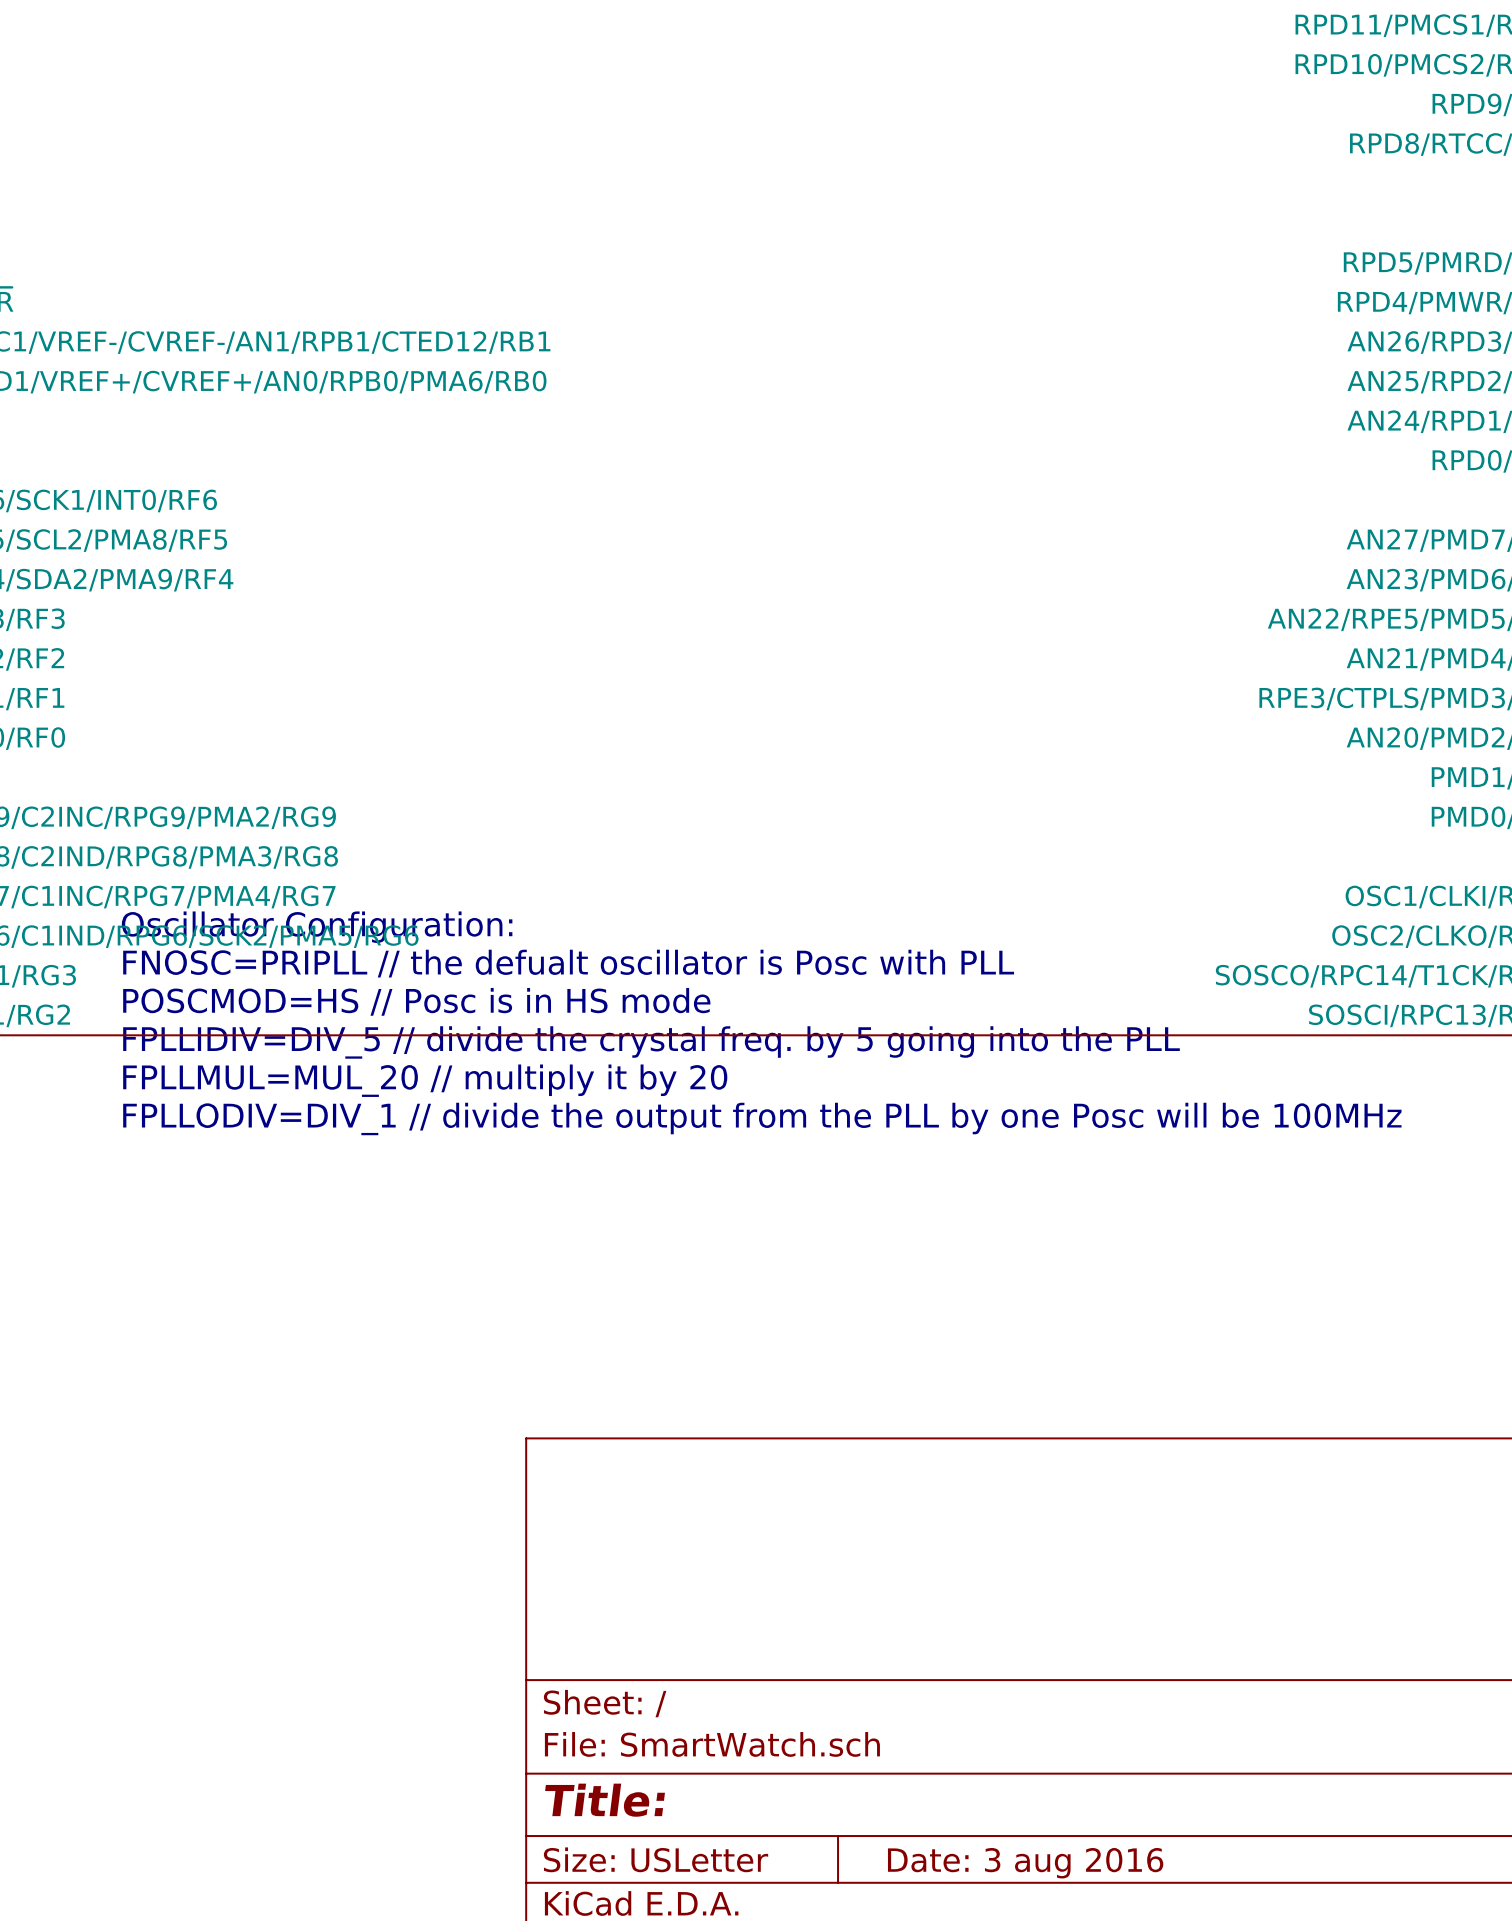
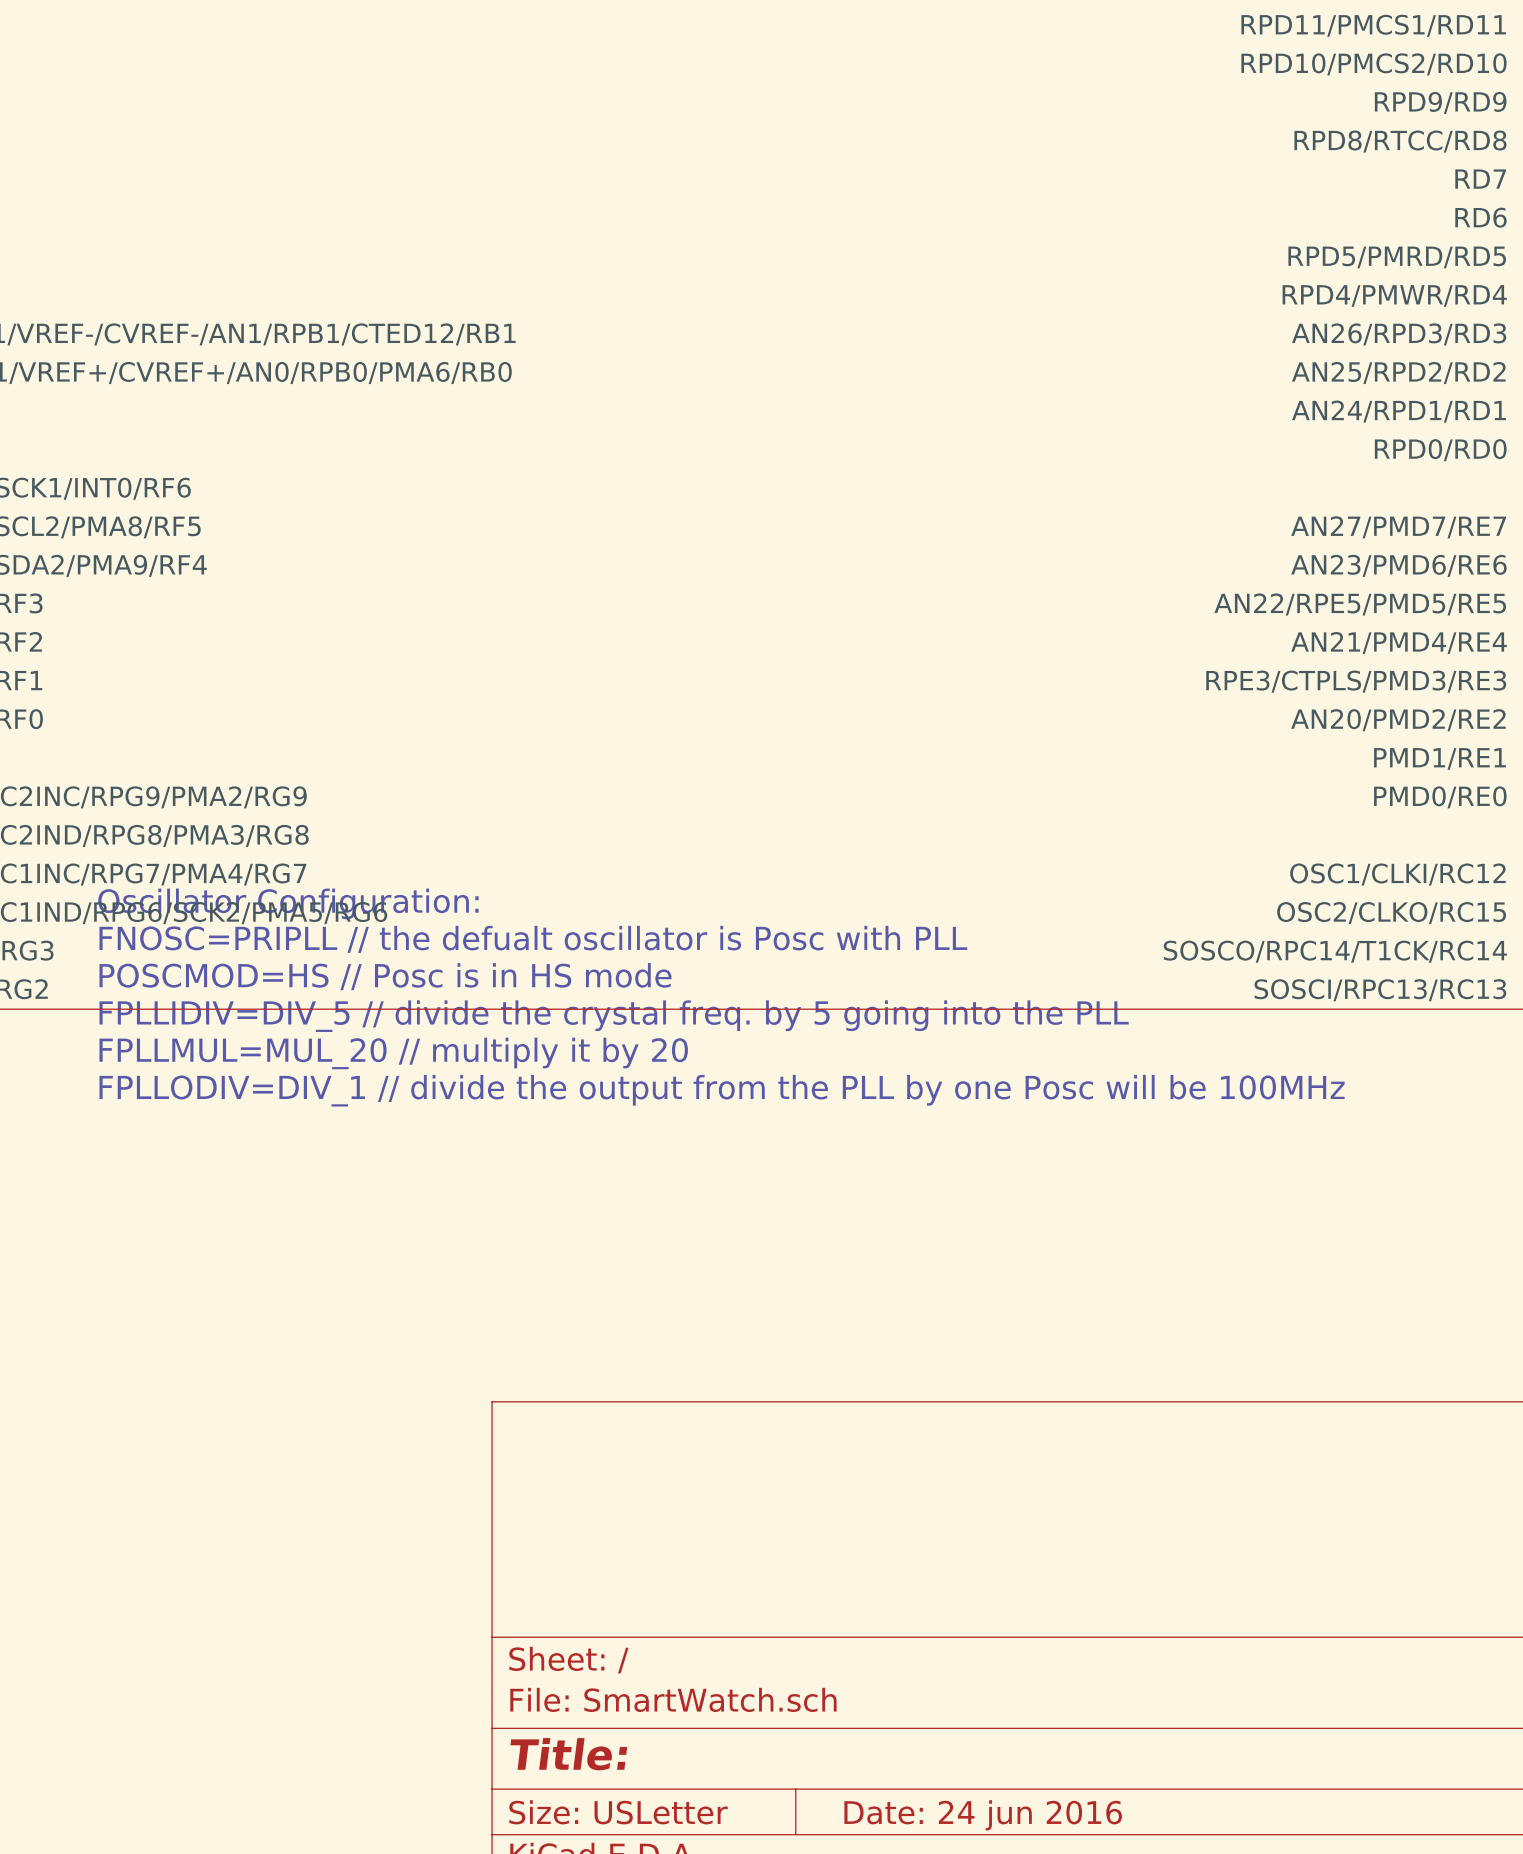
title block: Date: 3 aug 2016 (1025, 1863) -> Date: 24 jun 2016 (983, 1815)

